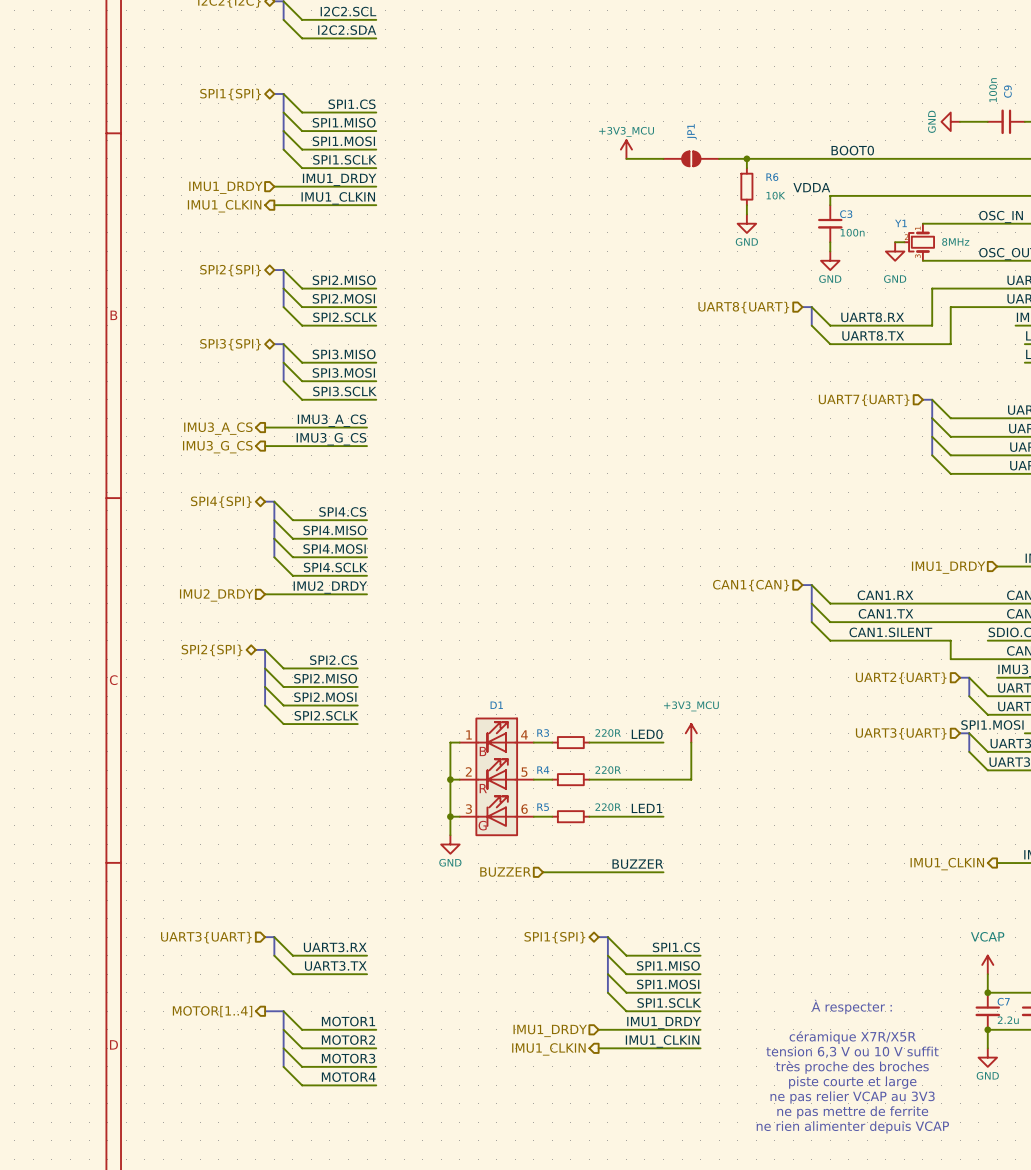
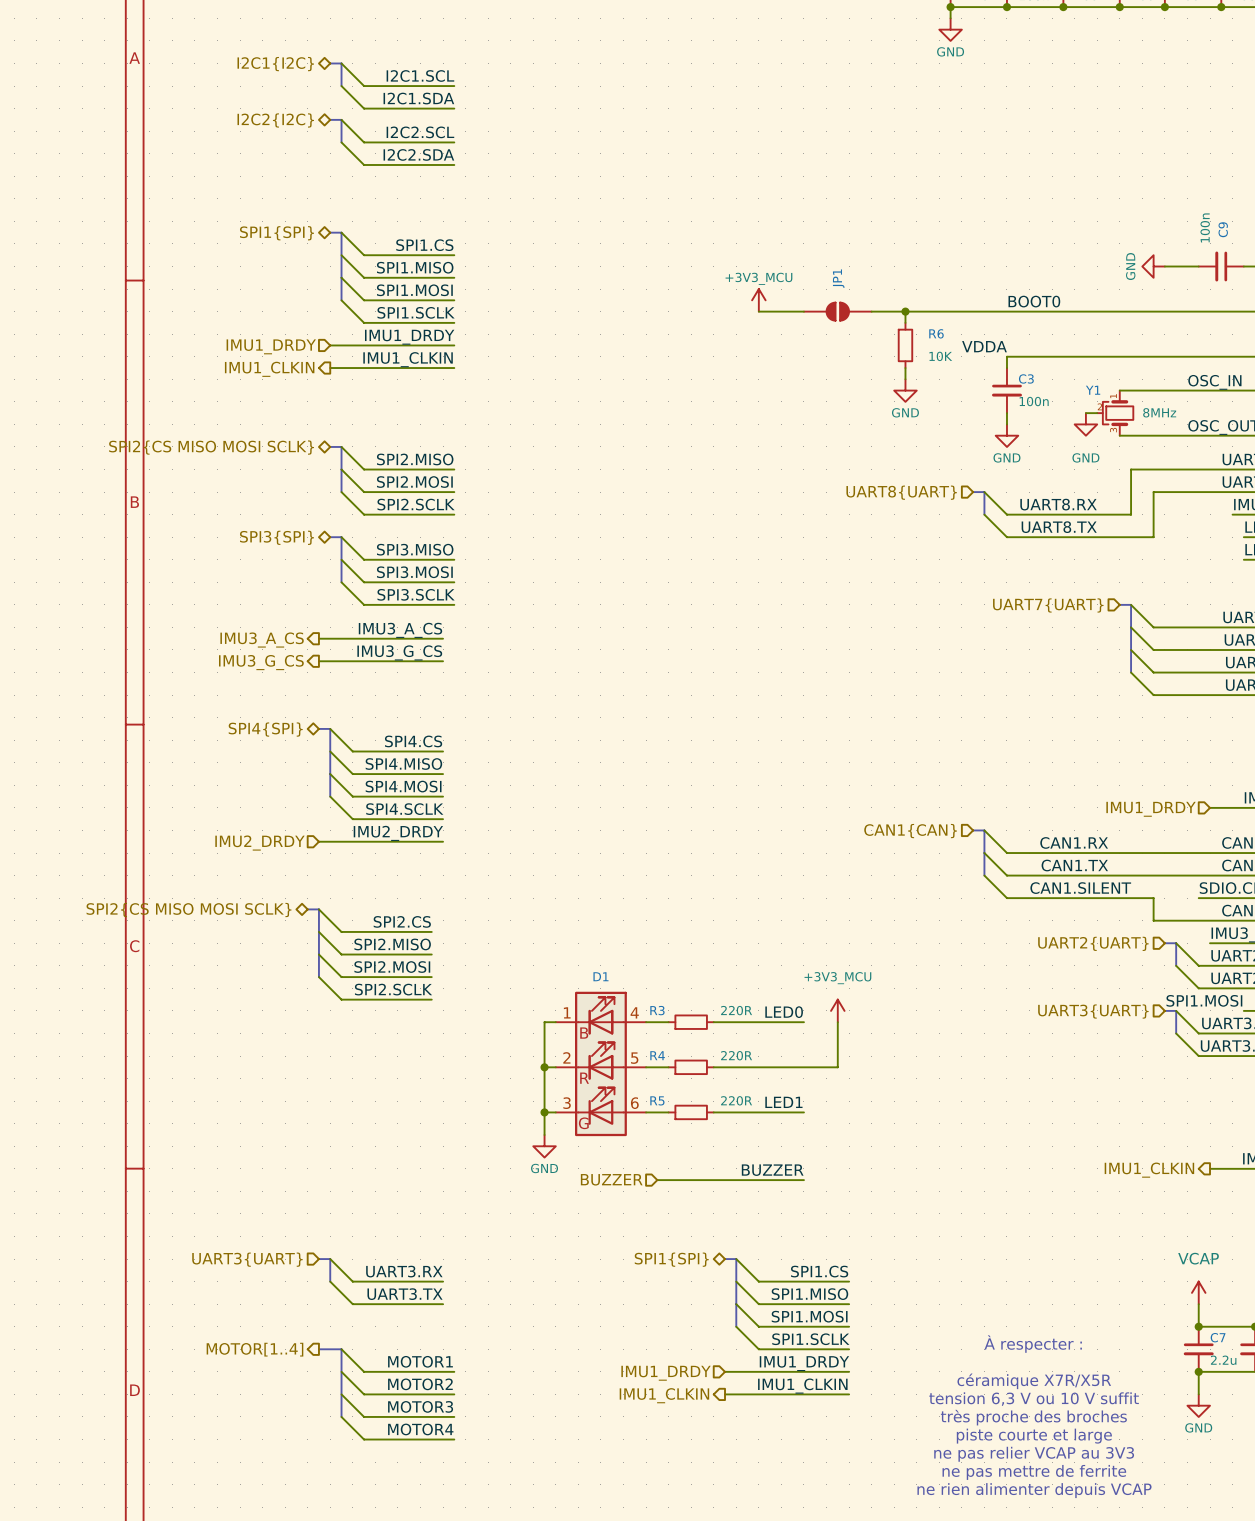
hierarchical label: SPI2{SPI} (230, 270) -> SPI2{CS MISO MOSI SCLK} (211, 447)
hierarchical label: SPI2{SPI} (212, 650) -> SPI2{CS MISO MOSI SCLK} (188, 910)

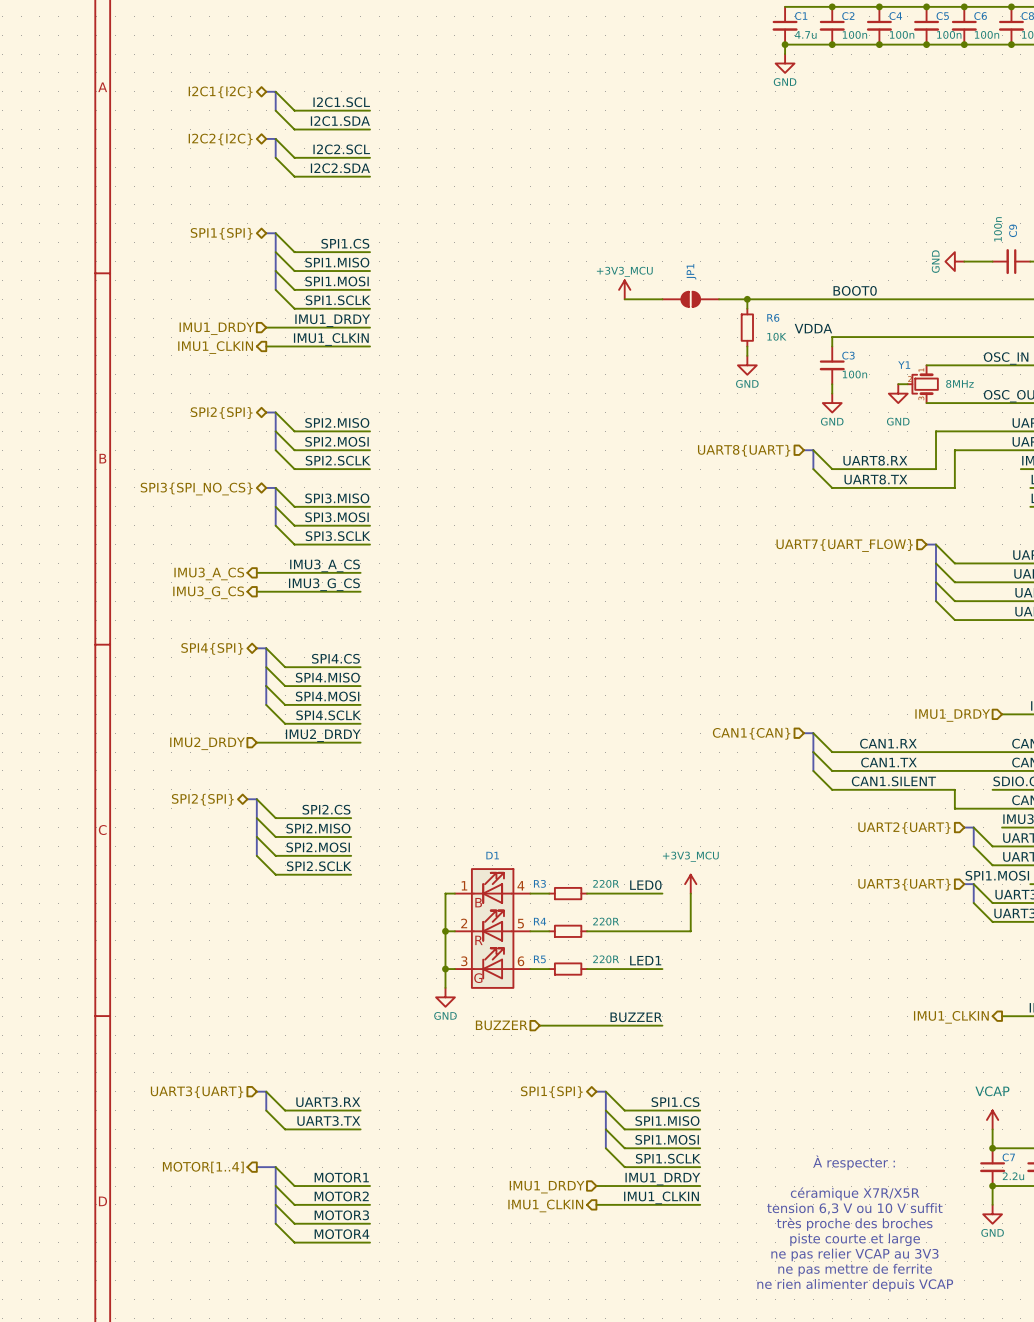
hierarchical label: SPI2{CS MISO MOSI SCLK} (211, 447) -> SPI2{SPI} (221, 413)
hierarchical label: SPI3{SPI} (276, 537) -> SPI3{SPI_NO_CS} (196, 488)
hierarchical label: UART7{UART} (1048, 605) -> UART7{UART_FLOW} (844, 545)
hierarchical label: SPI2{CS MISO MOSI SCLK} (188, 910) -> SPI2{SPI} (202, 799)

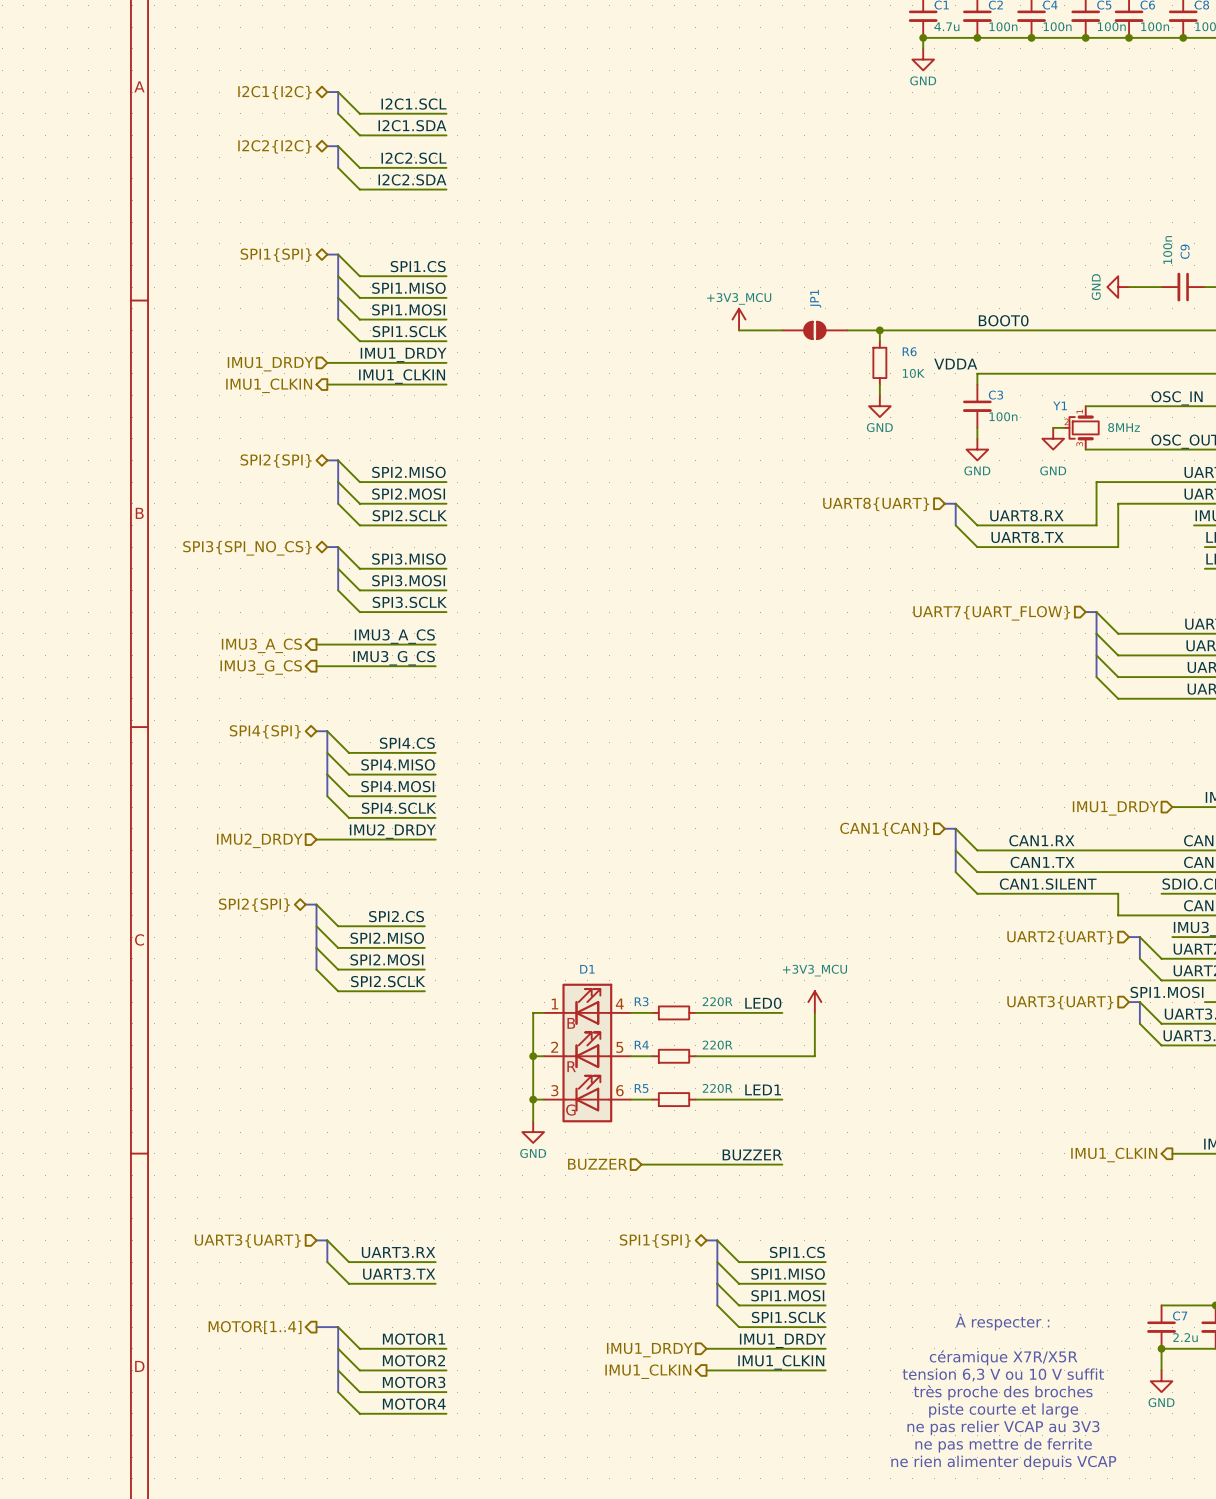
power symbol: VCAP (992, 1119) -> none
wire: (992, 1129) (992, 1148) -> none
junction: (992, 1148) -> none

